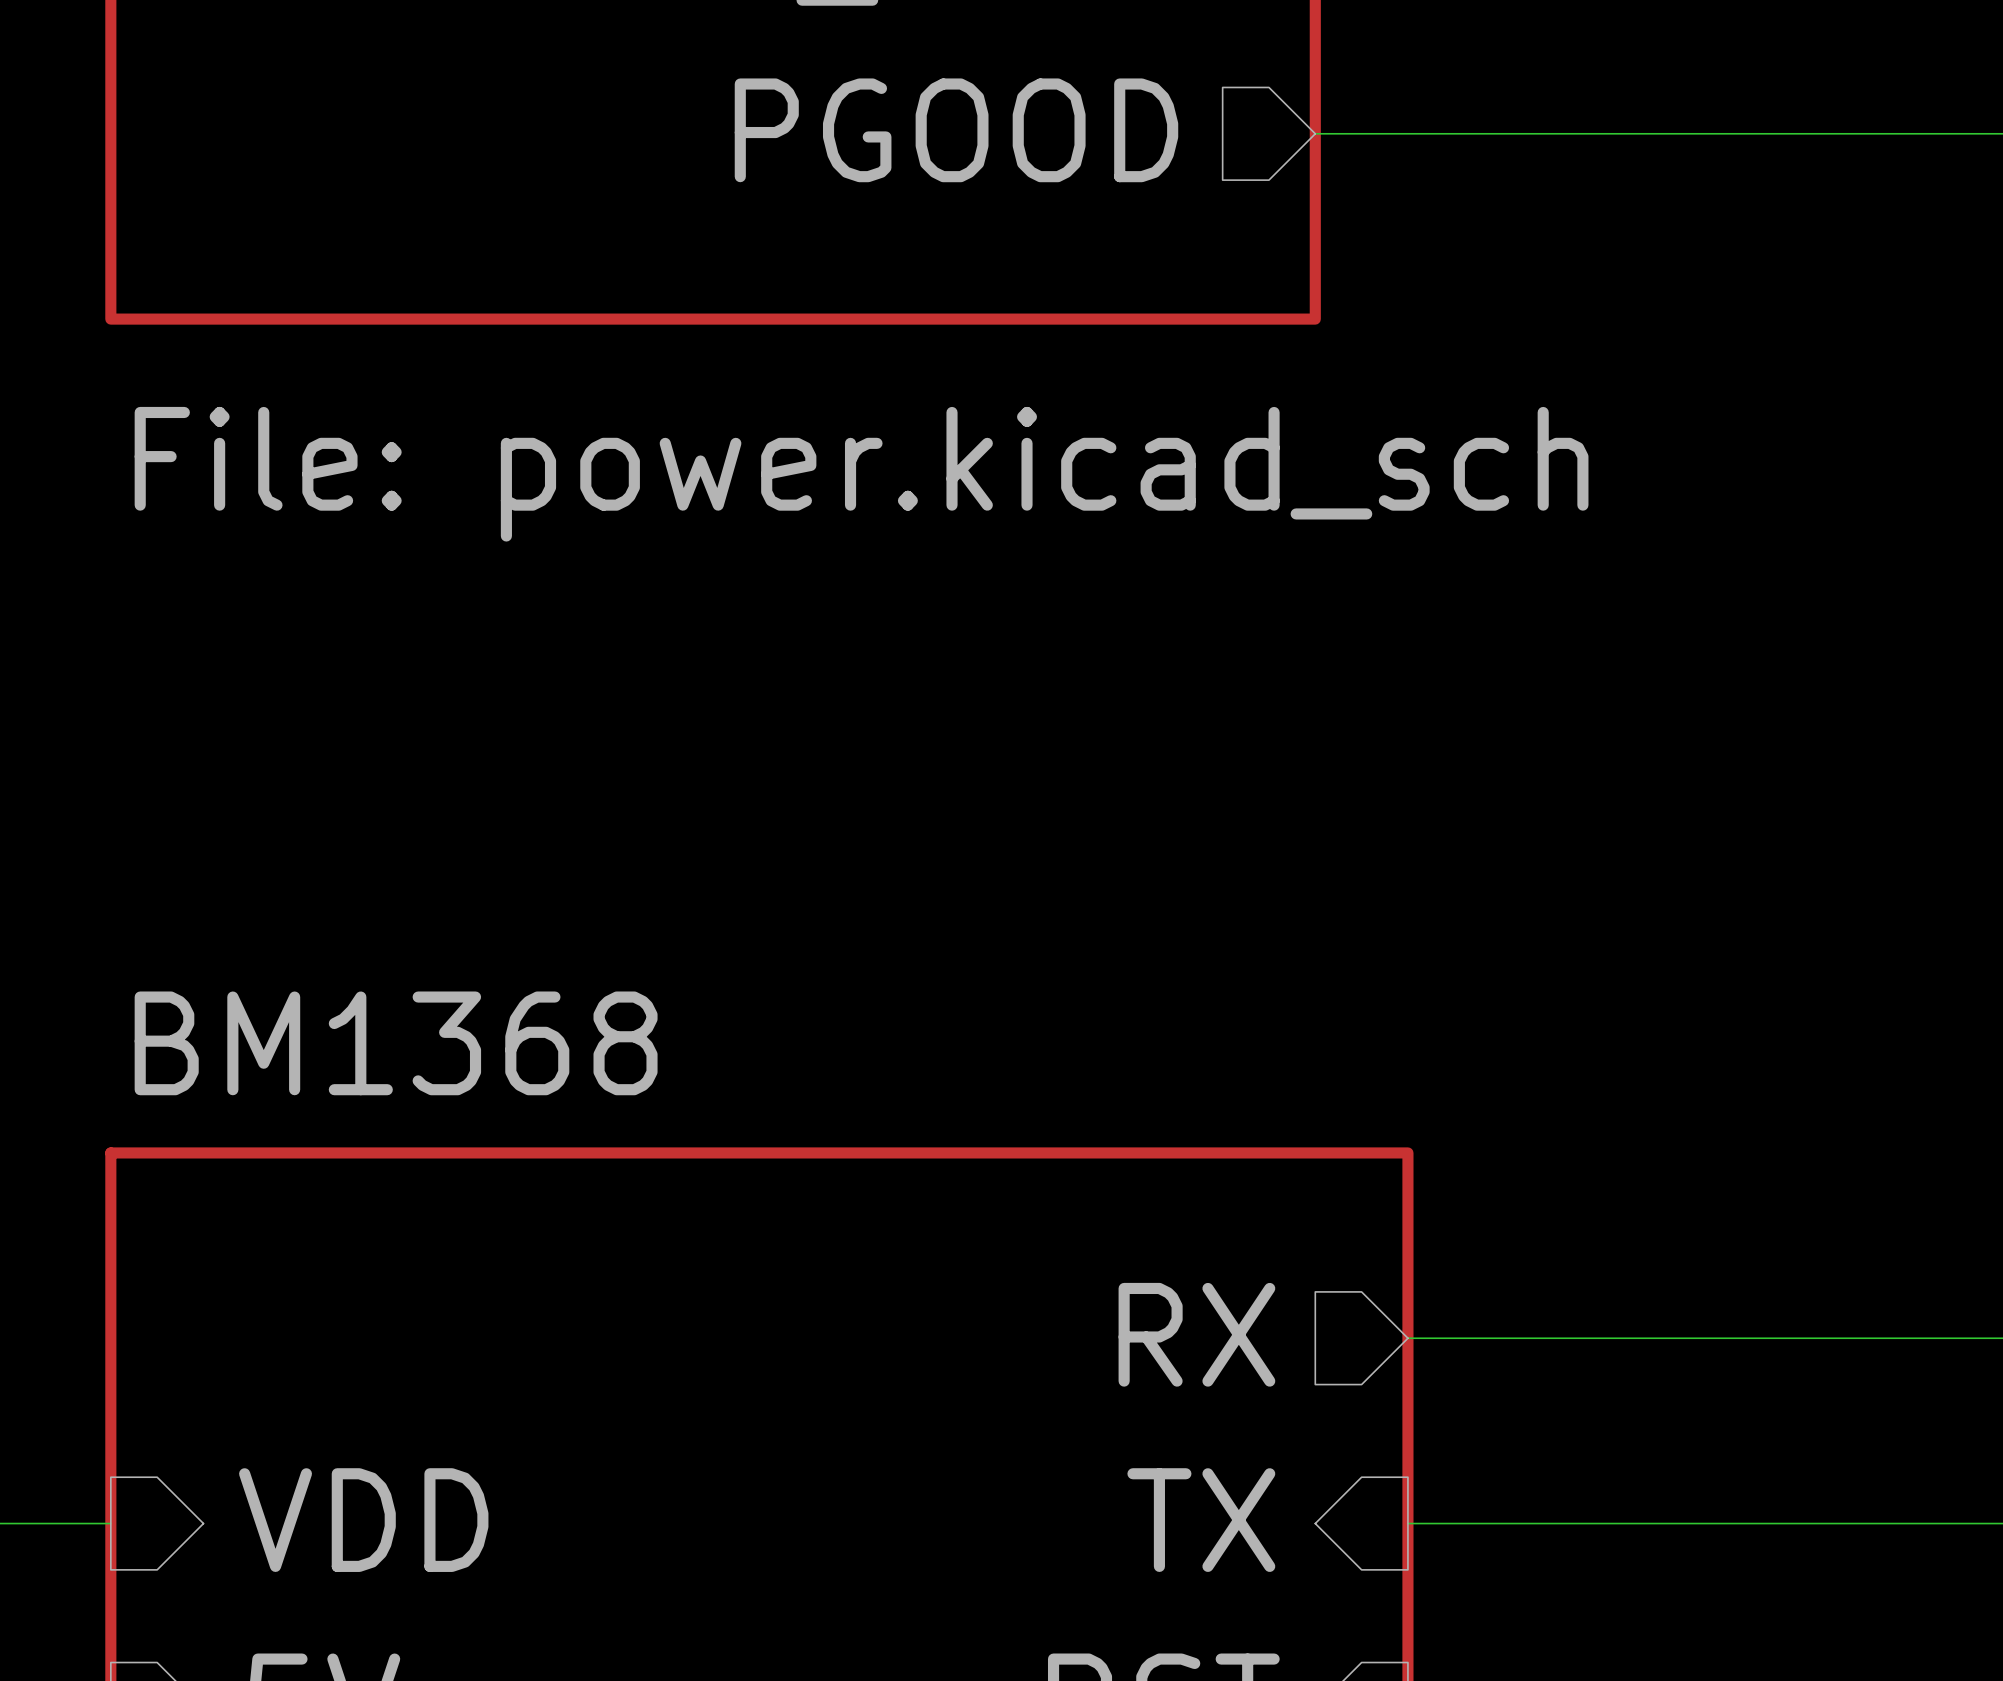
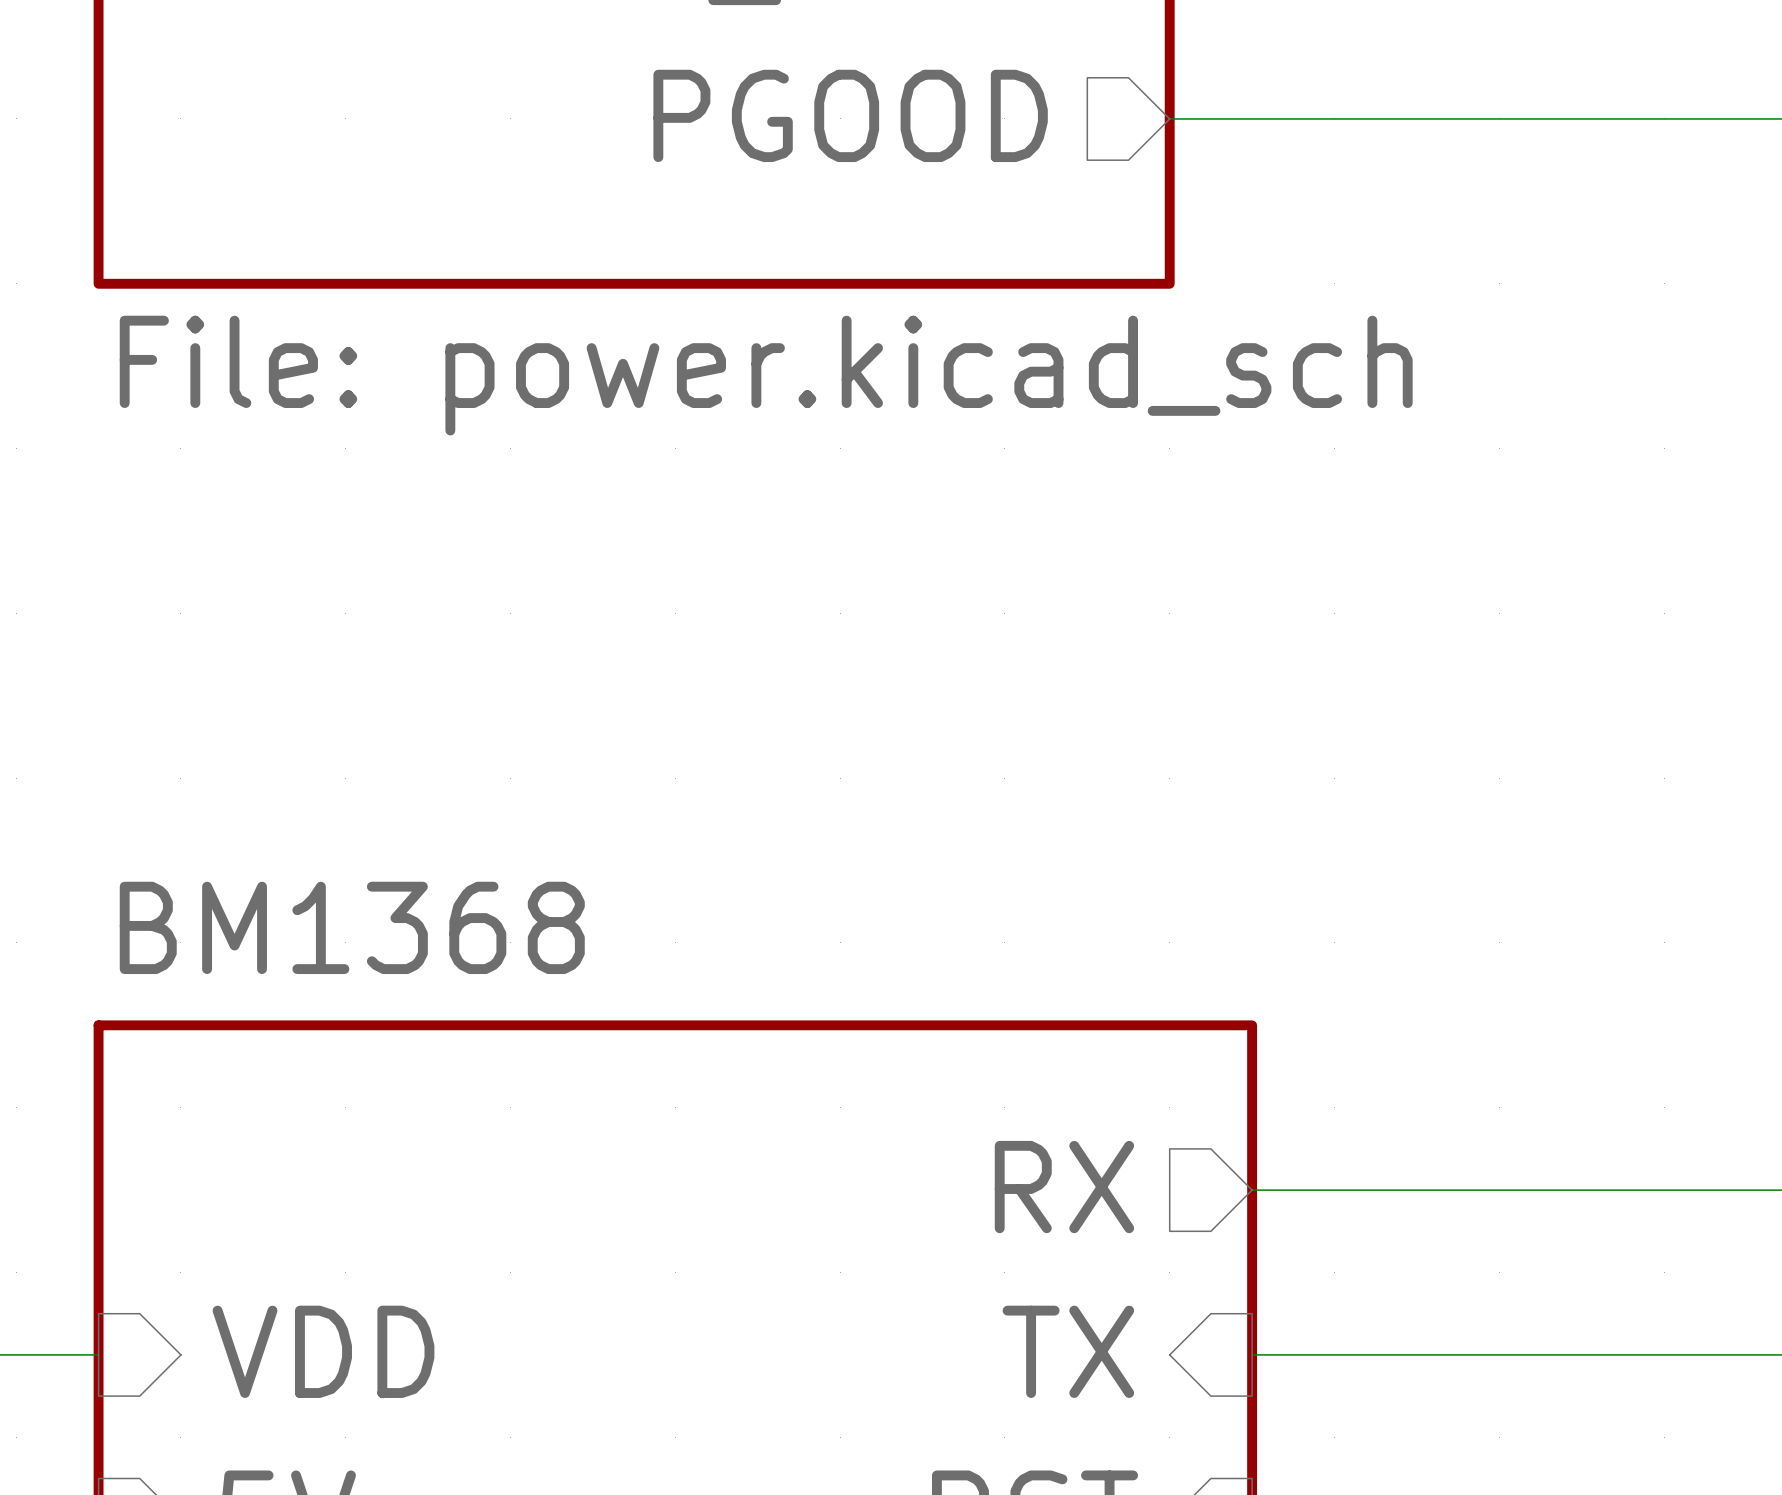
sheet value position: File: power.kicad_sch (861, 474) -> File: power.kicad_sch (766, 375)

